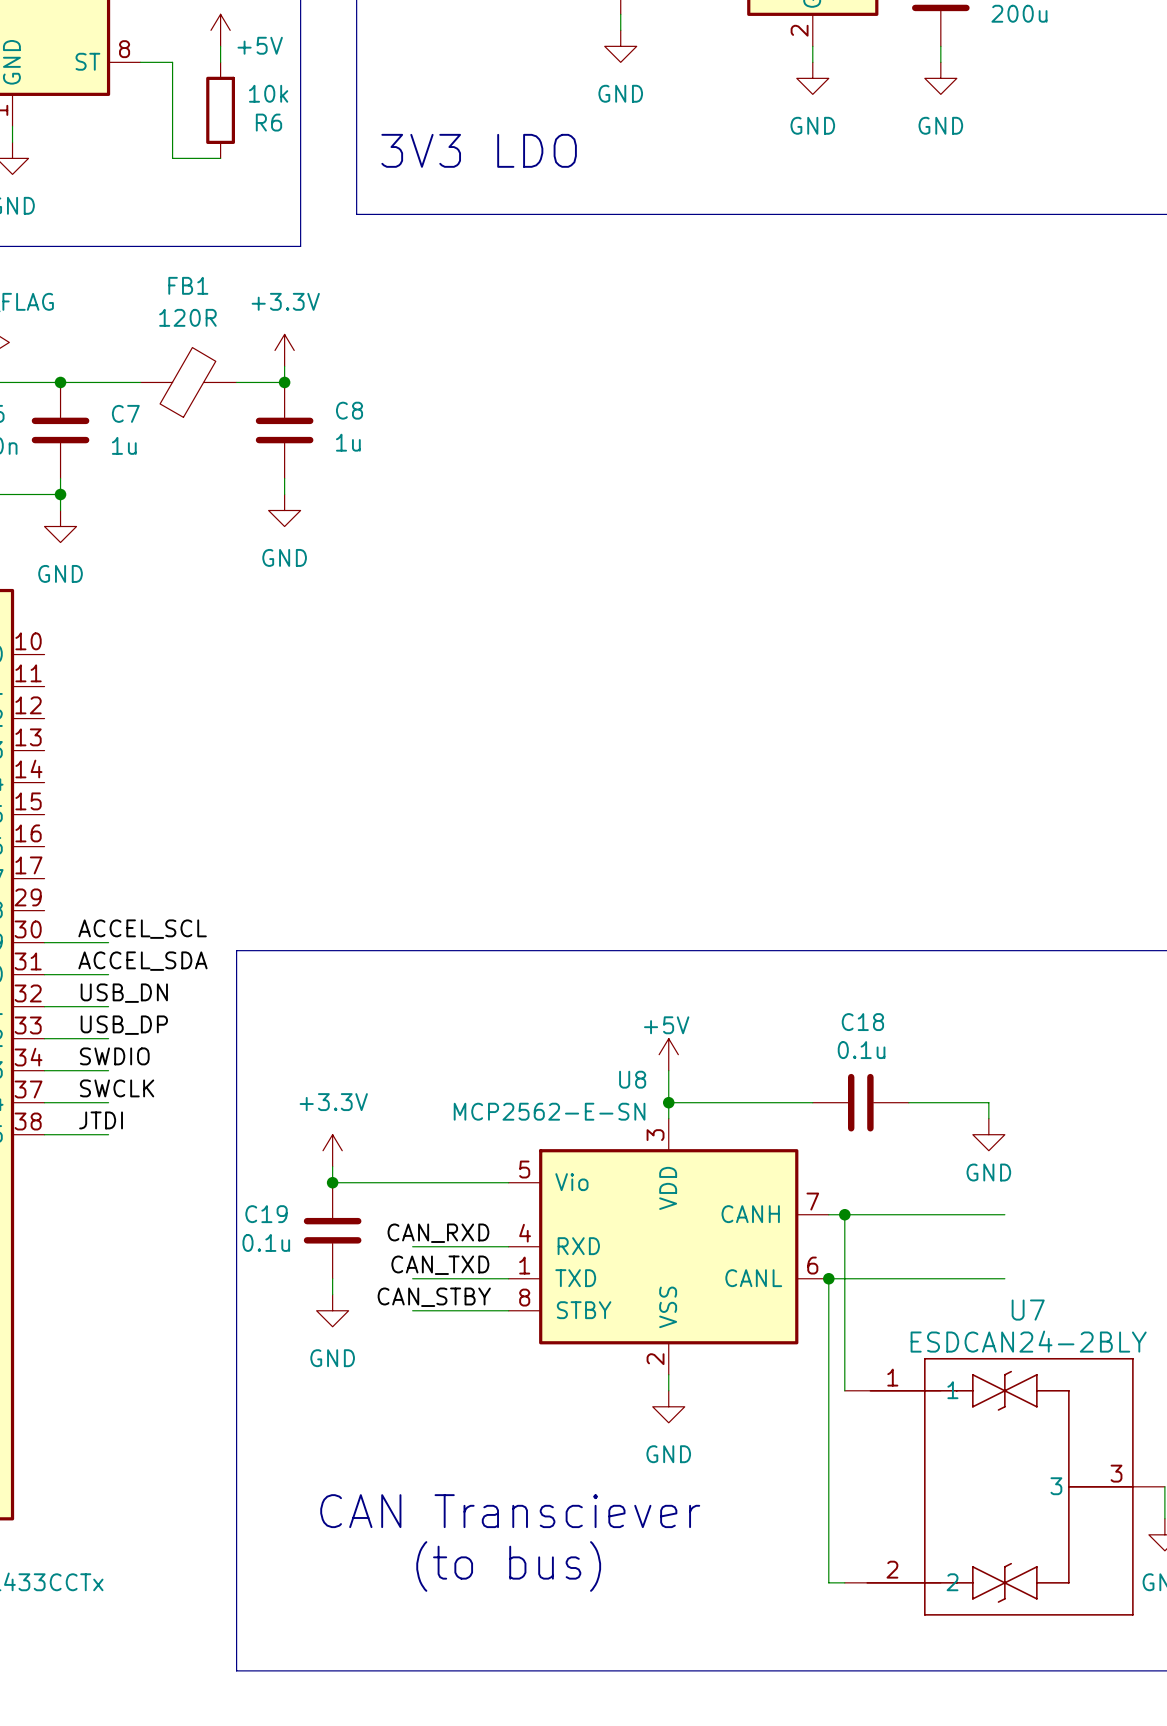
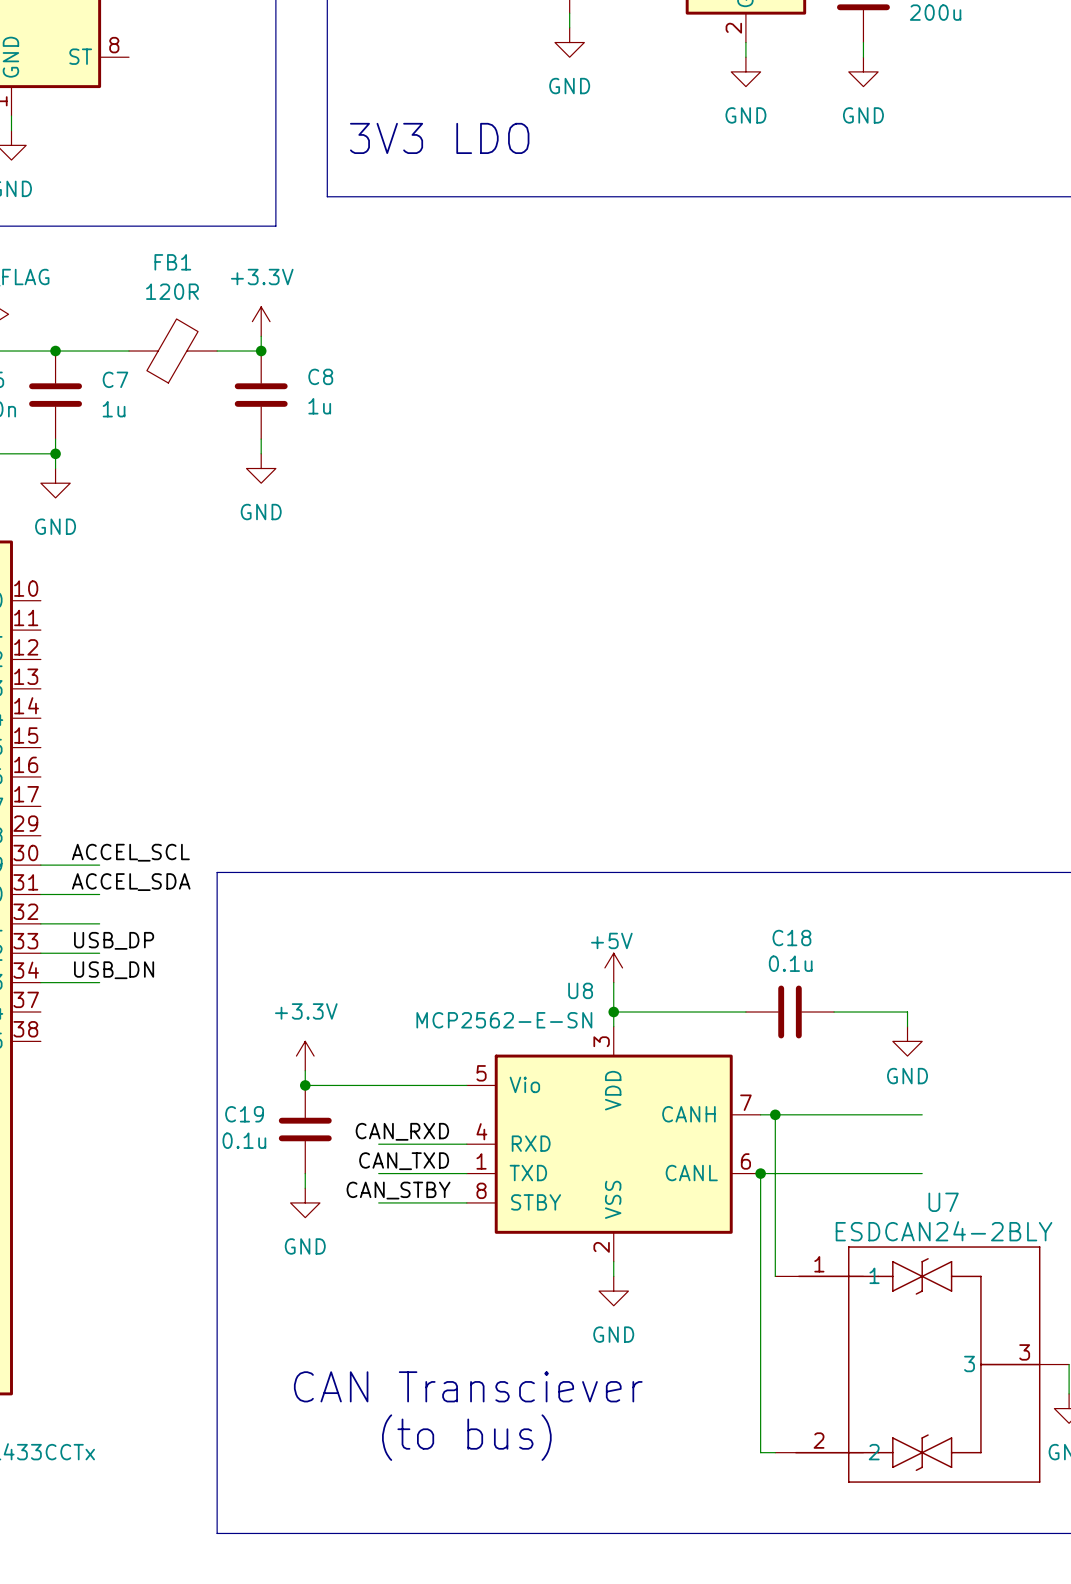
power symbol: +5V (220, 30) -> none
wire: (220, 46) (220, 62) -> none
wire: (140, 62) (172, 62) (172, 158) (220, 158) -> none
R6: 10k (220, 110) -> none
label: USB_DN (124, 993) -> none
label: SWDIO (114, 1056) -> USB_DN (114, 970)
label: SWCLK (117, 1088) -> none
wire: (44, 1102) (108, 1102) -> none
label: JTDI (101, 1120) -> none
wire: (44, 1134) (108, 1134) -> none

